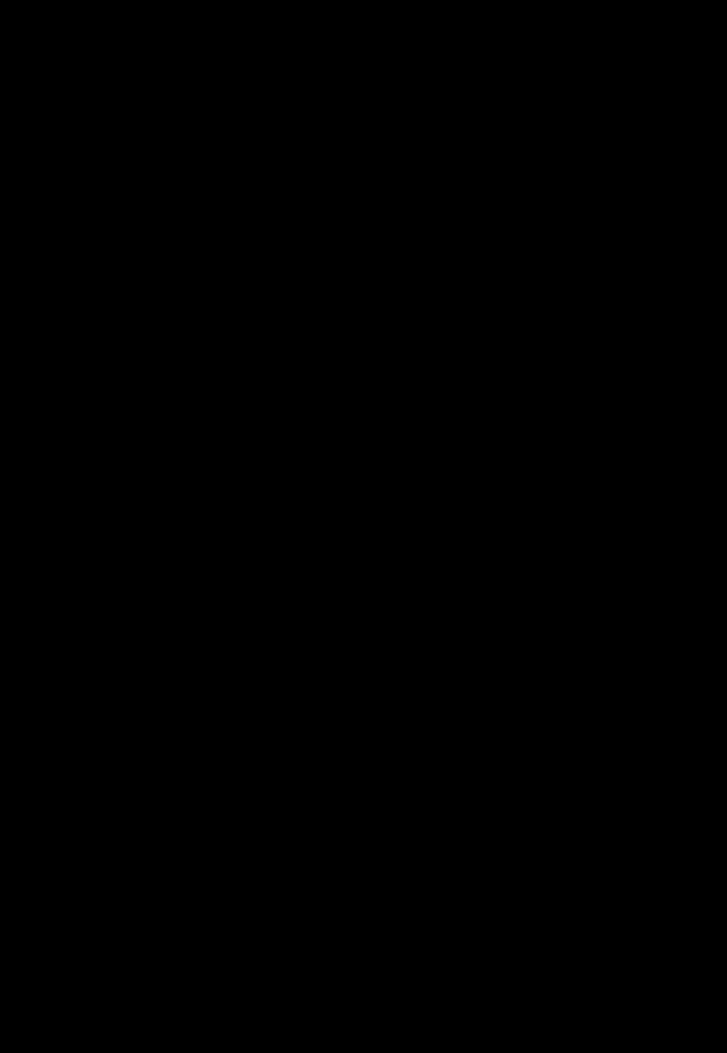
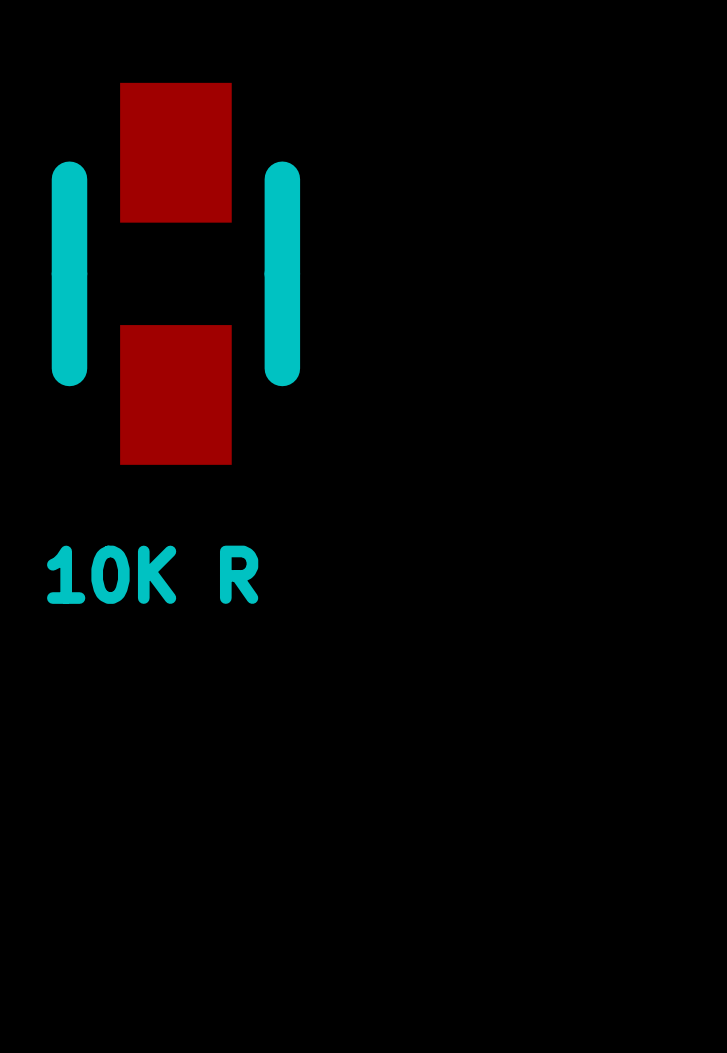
part: none -> (175, 273)
text: none -> 10K R (152, 574)

